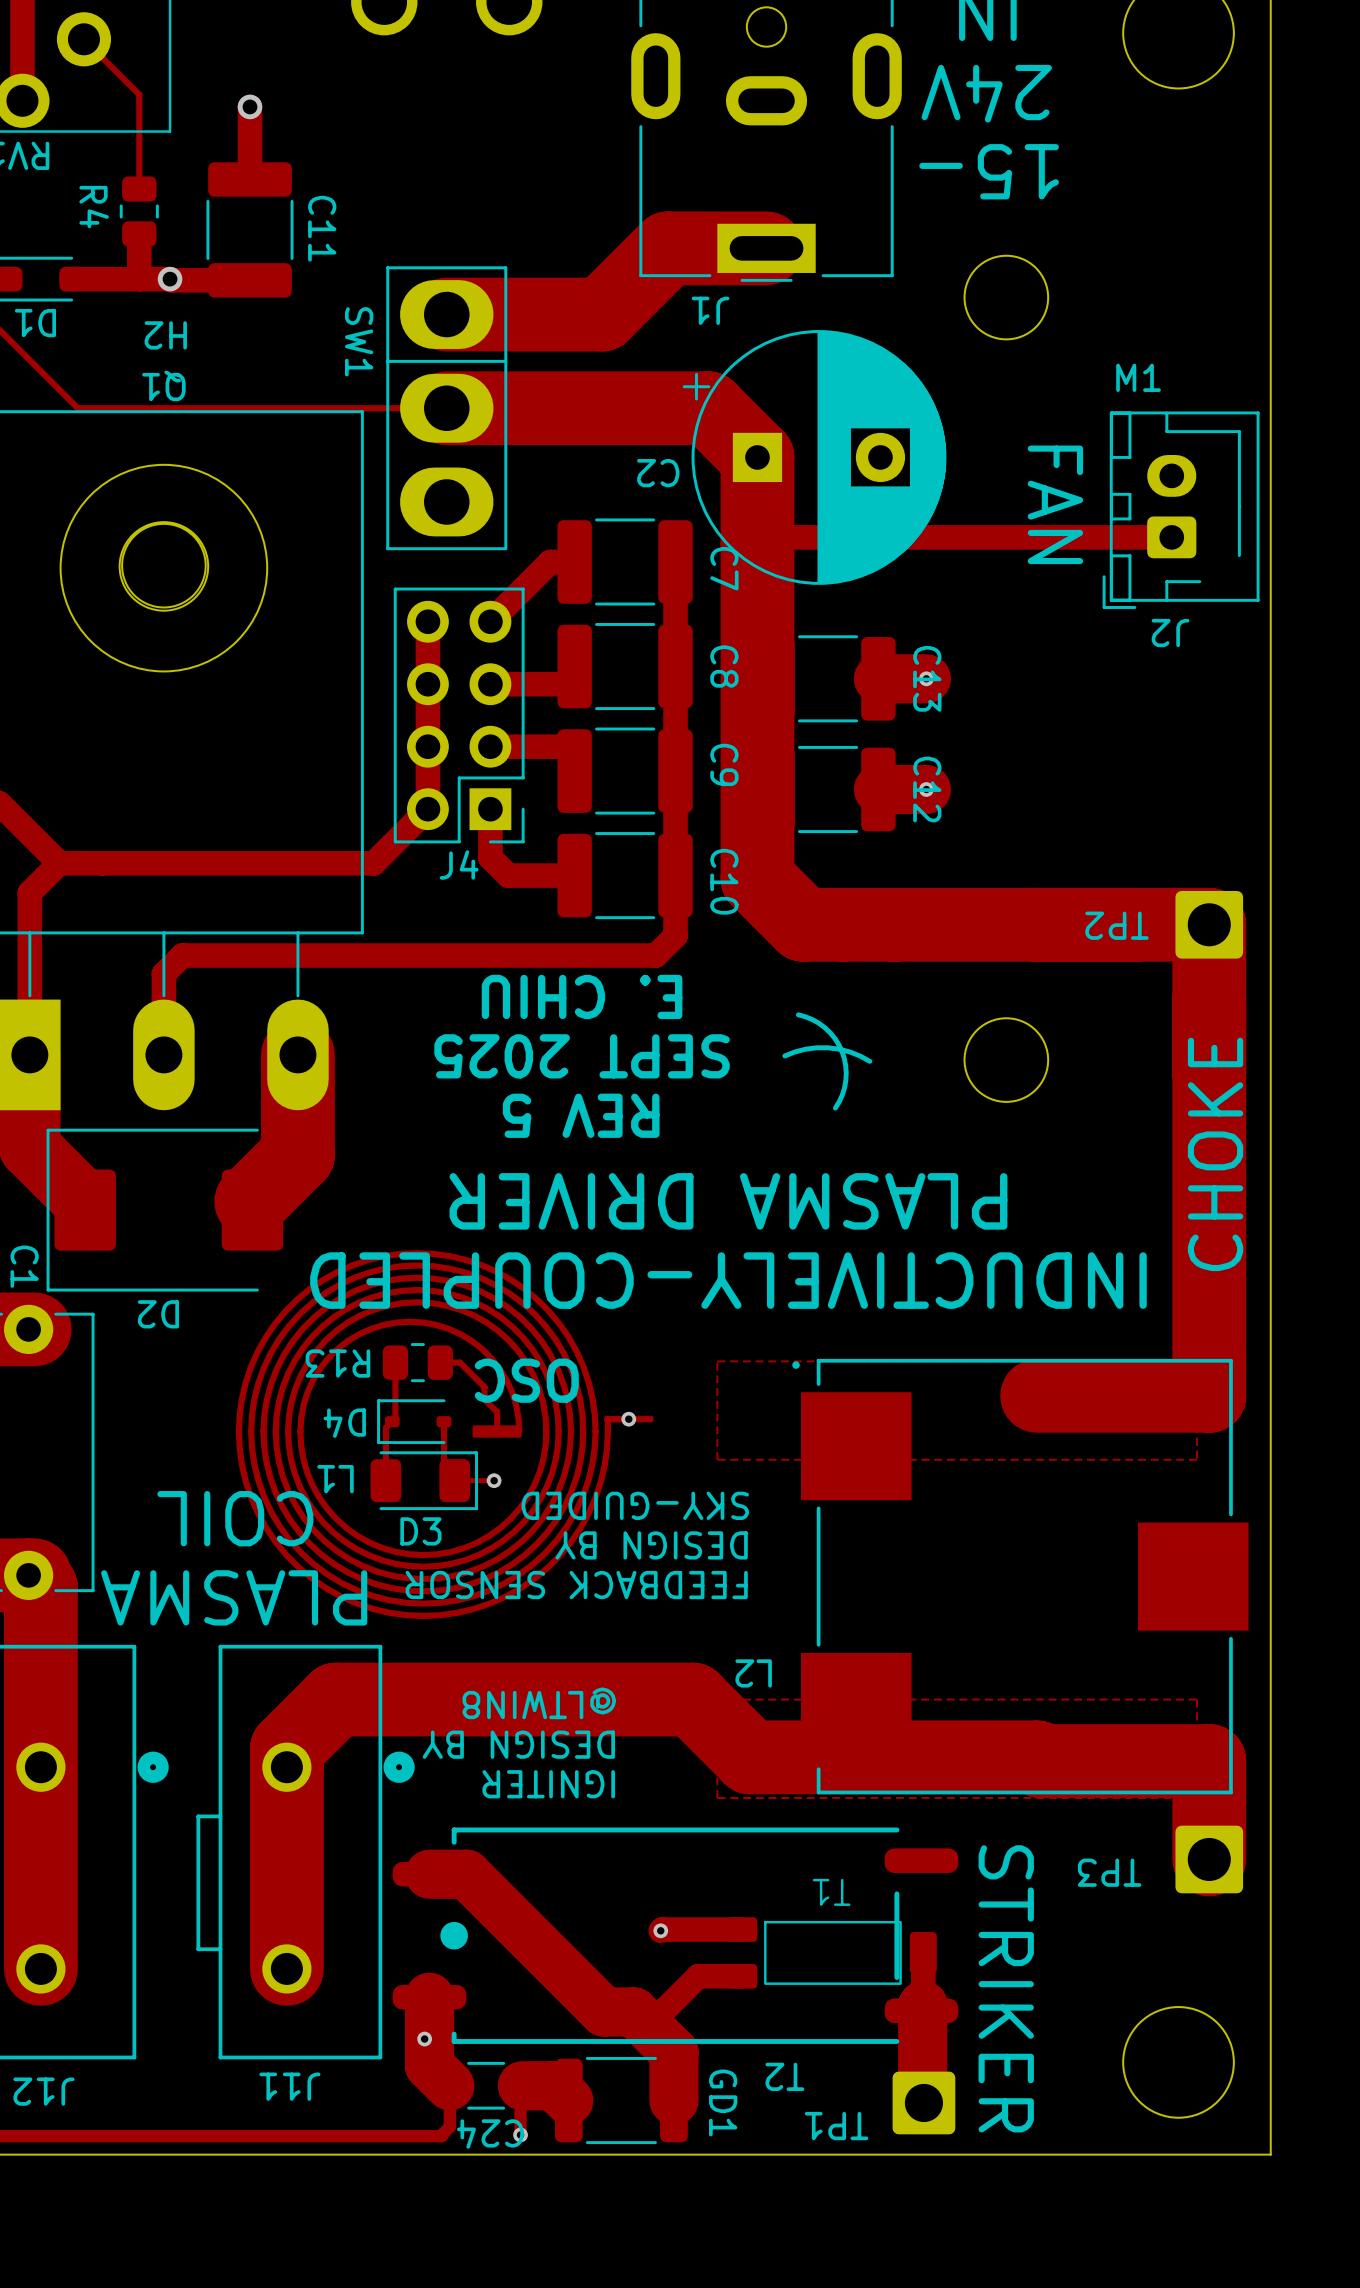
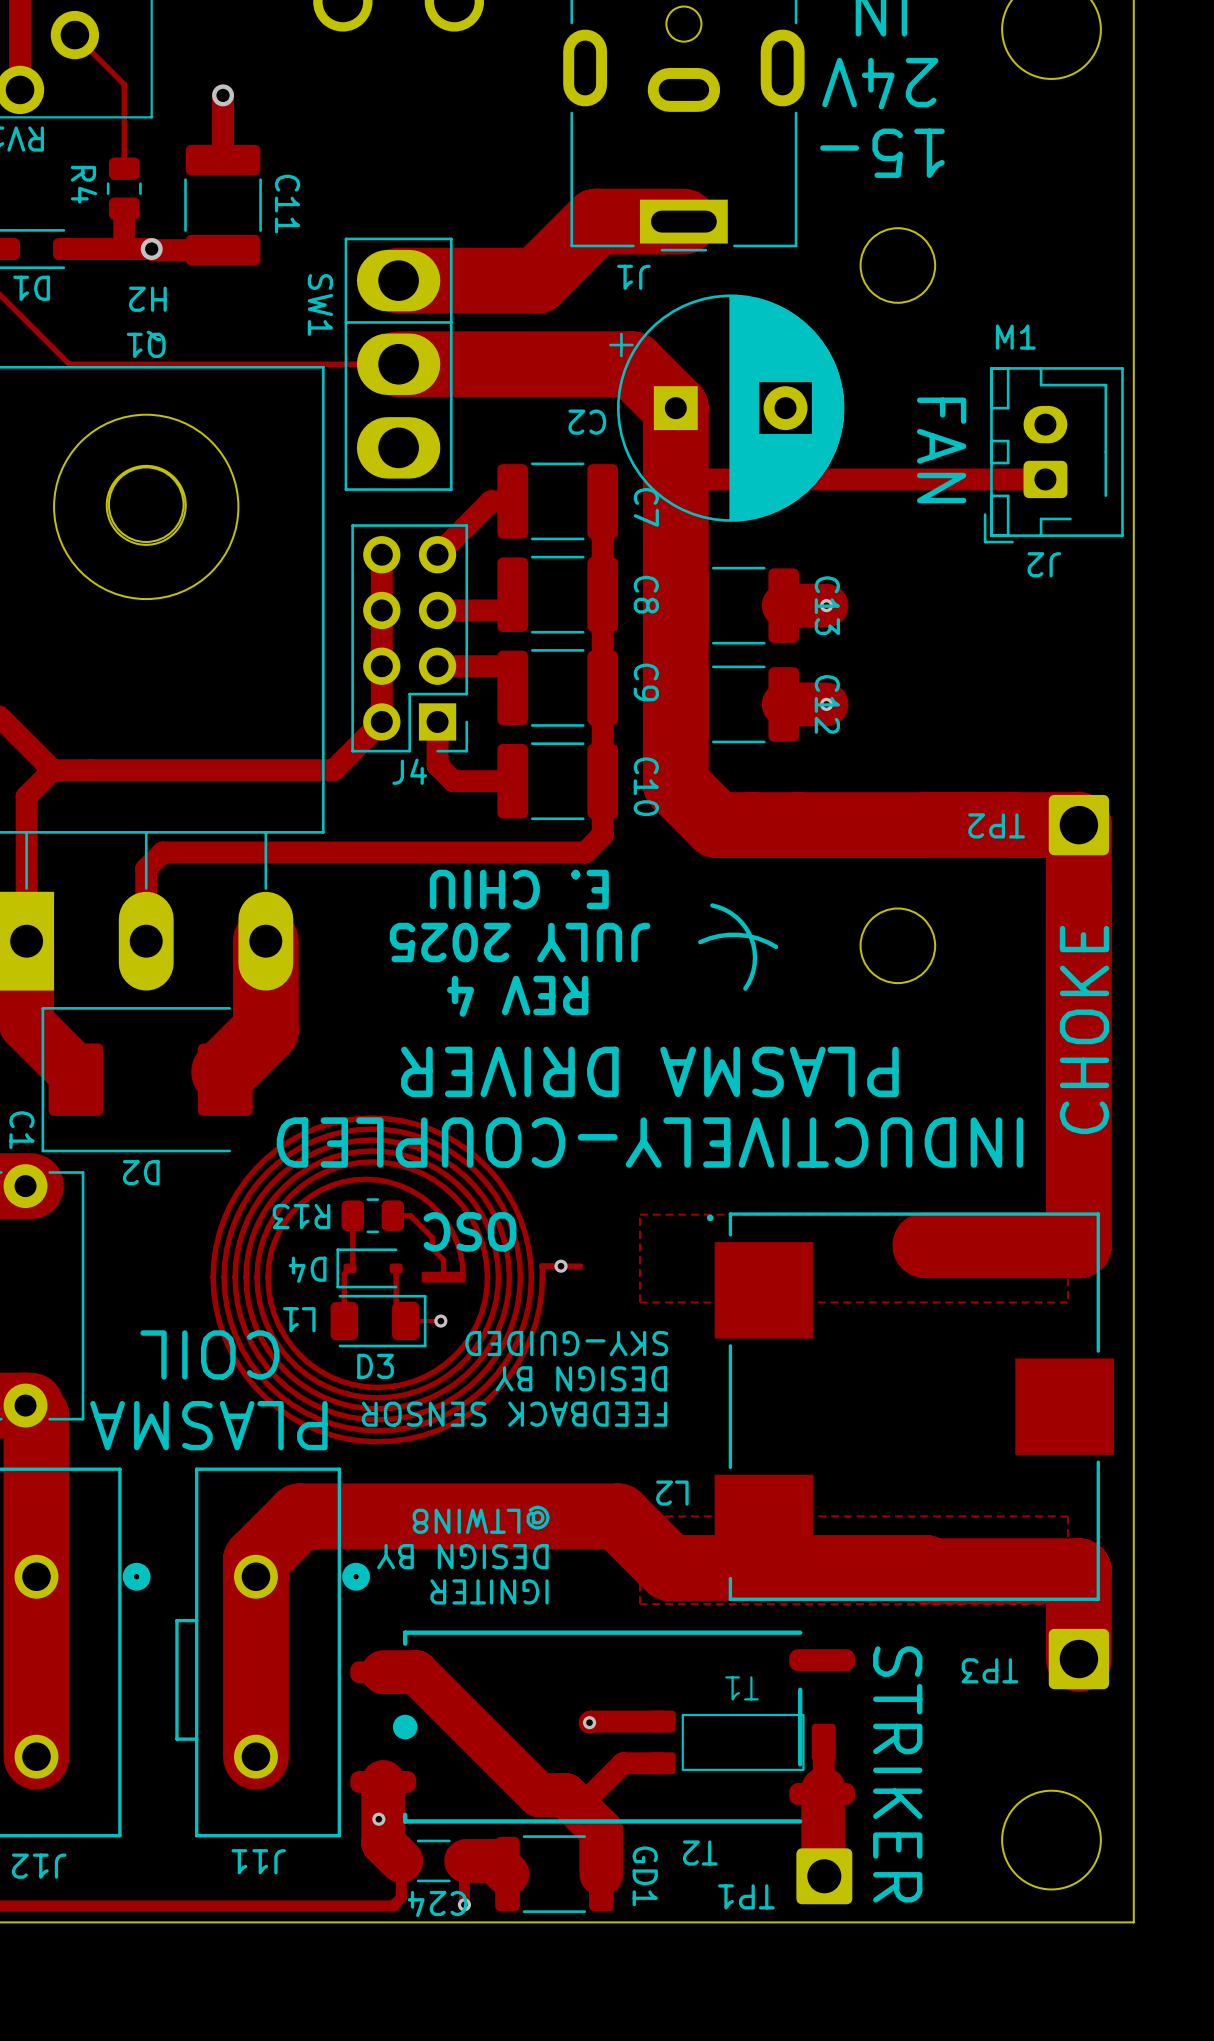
text: SEPT 2025 (582, 1056) -> JULY 2025 (520, 942)
text: REV 5 (581, 1115) -> REV 4 (517, 996)

